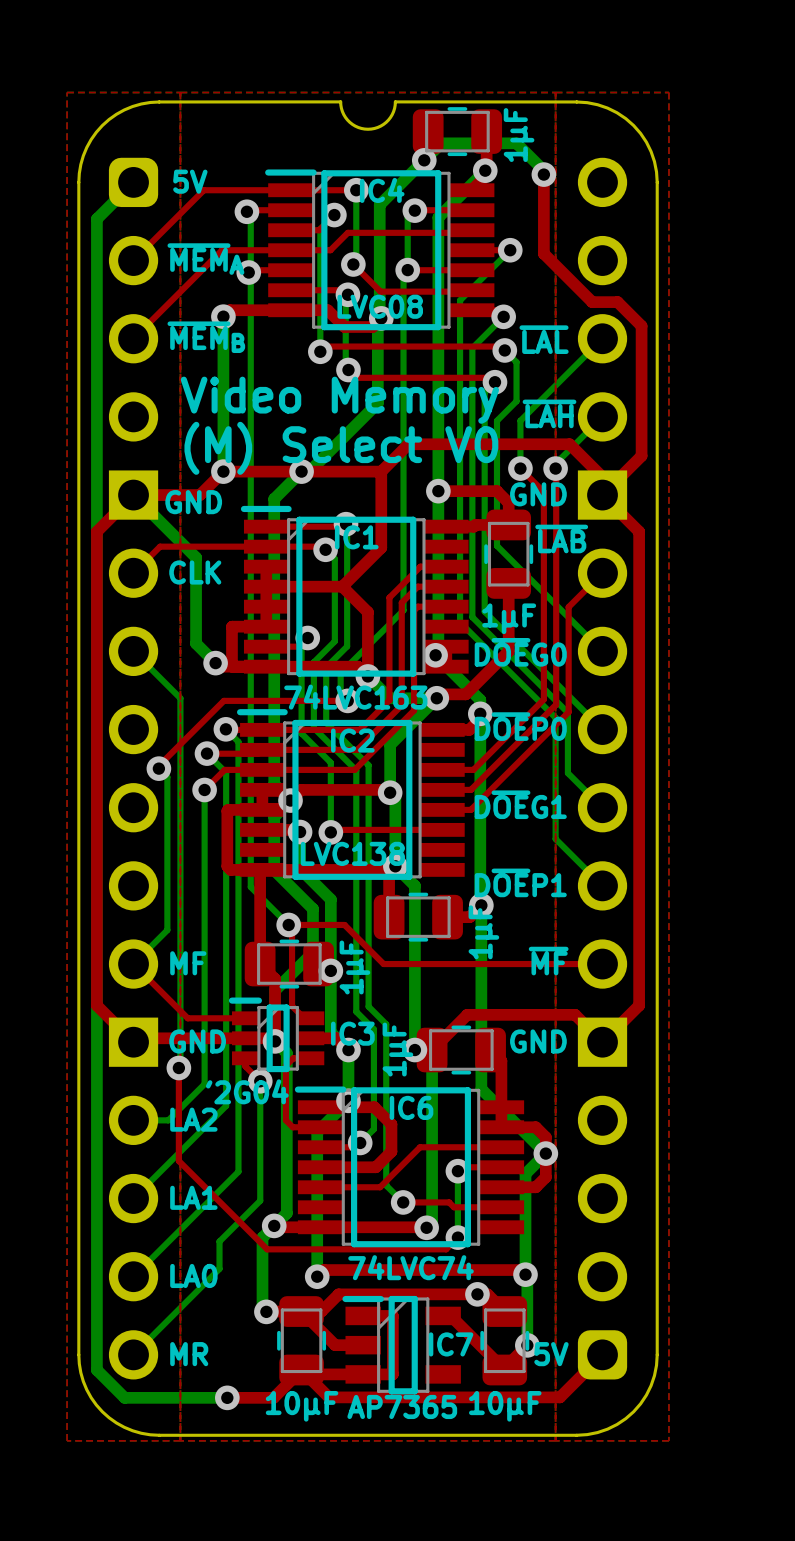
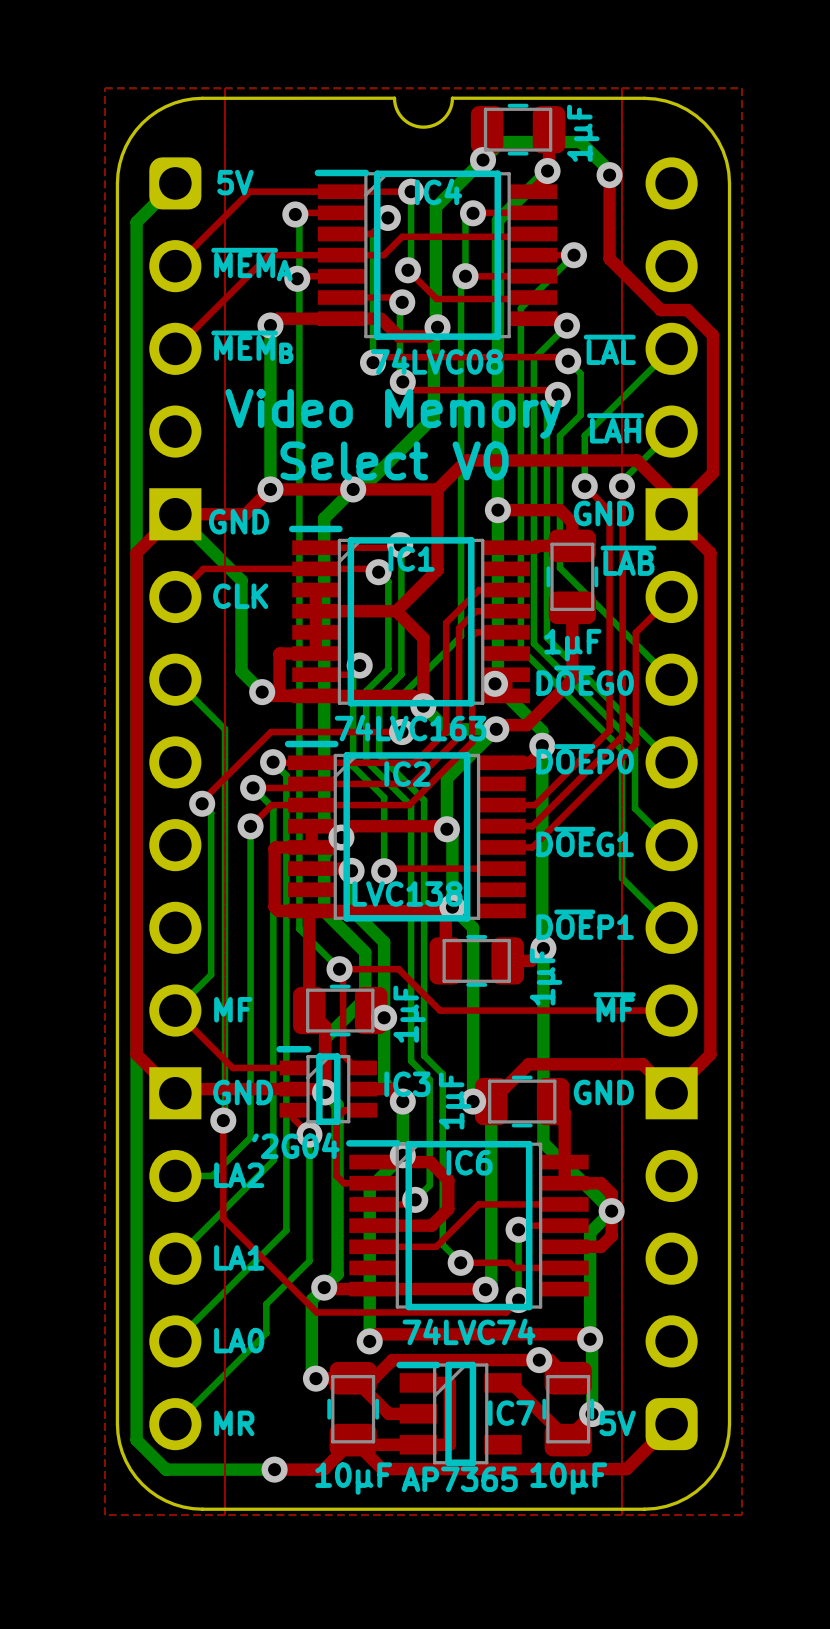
IC4 text: LVC08 (380, 306) -> none
IC4 text: none -> 74LVC08 (437, 361)
text: (M) Select V0 (341, 448) -> Select V0 (394, 460)

